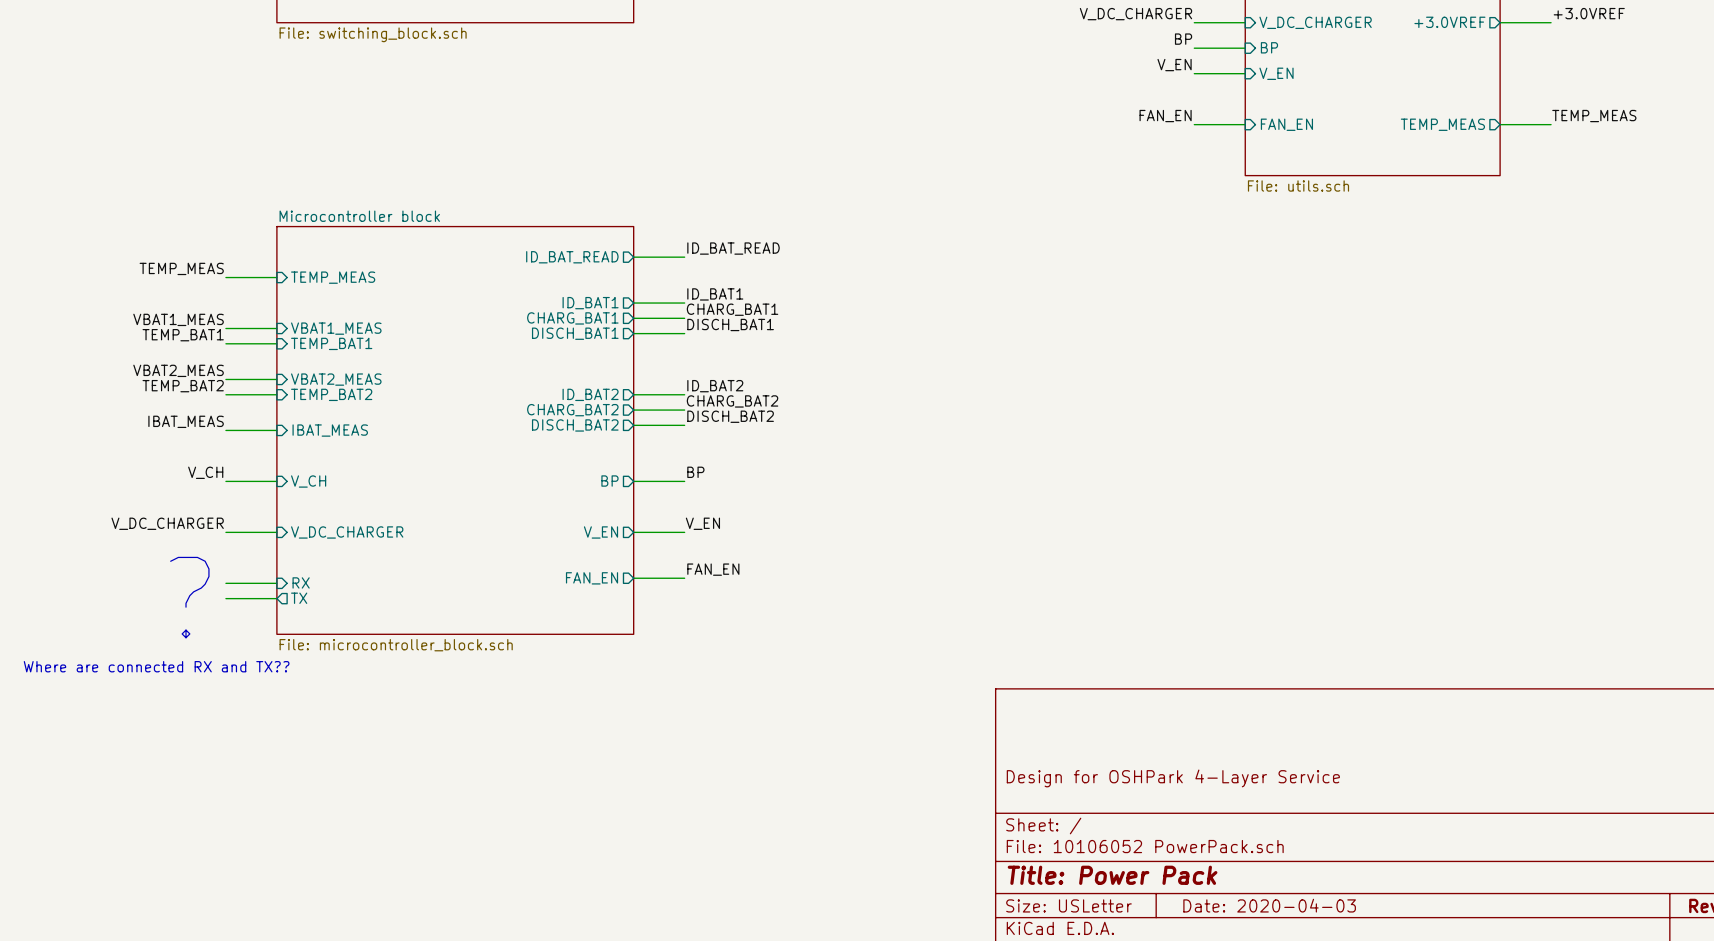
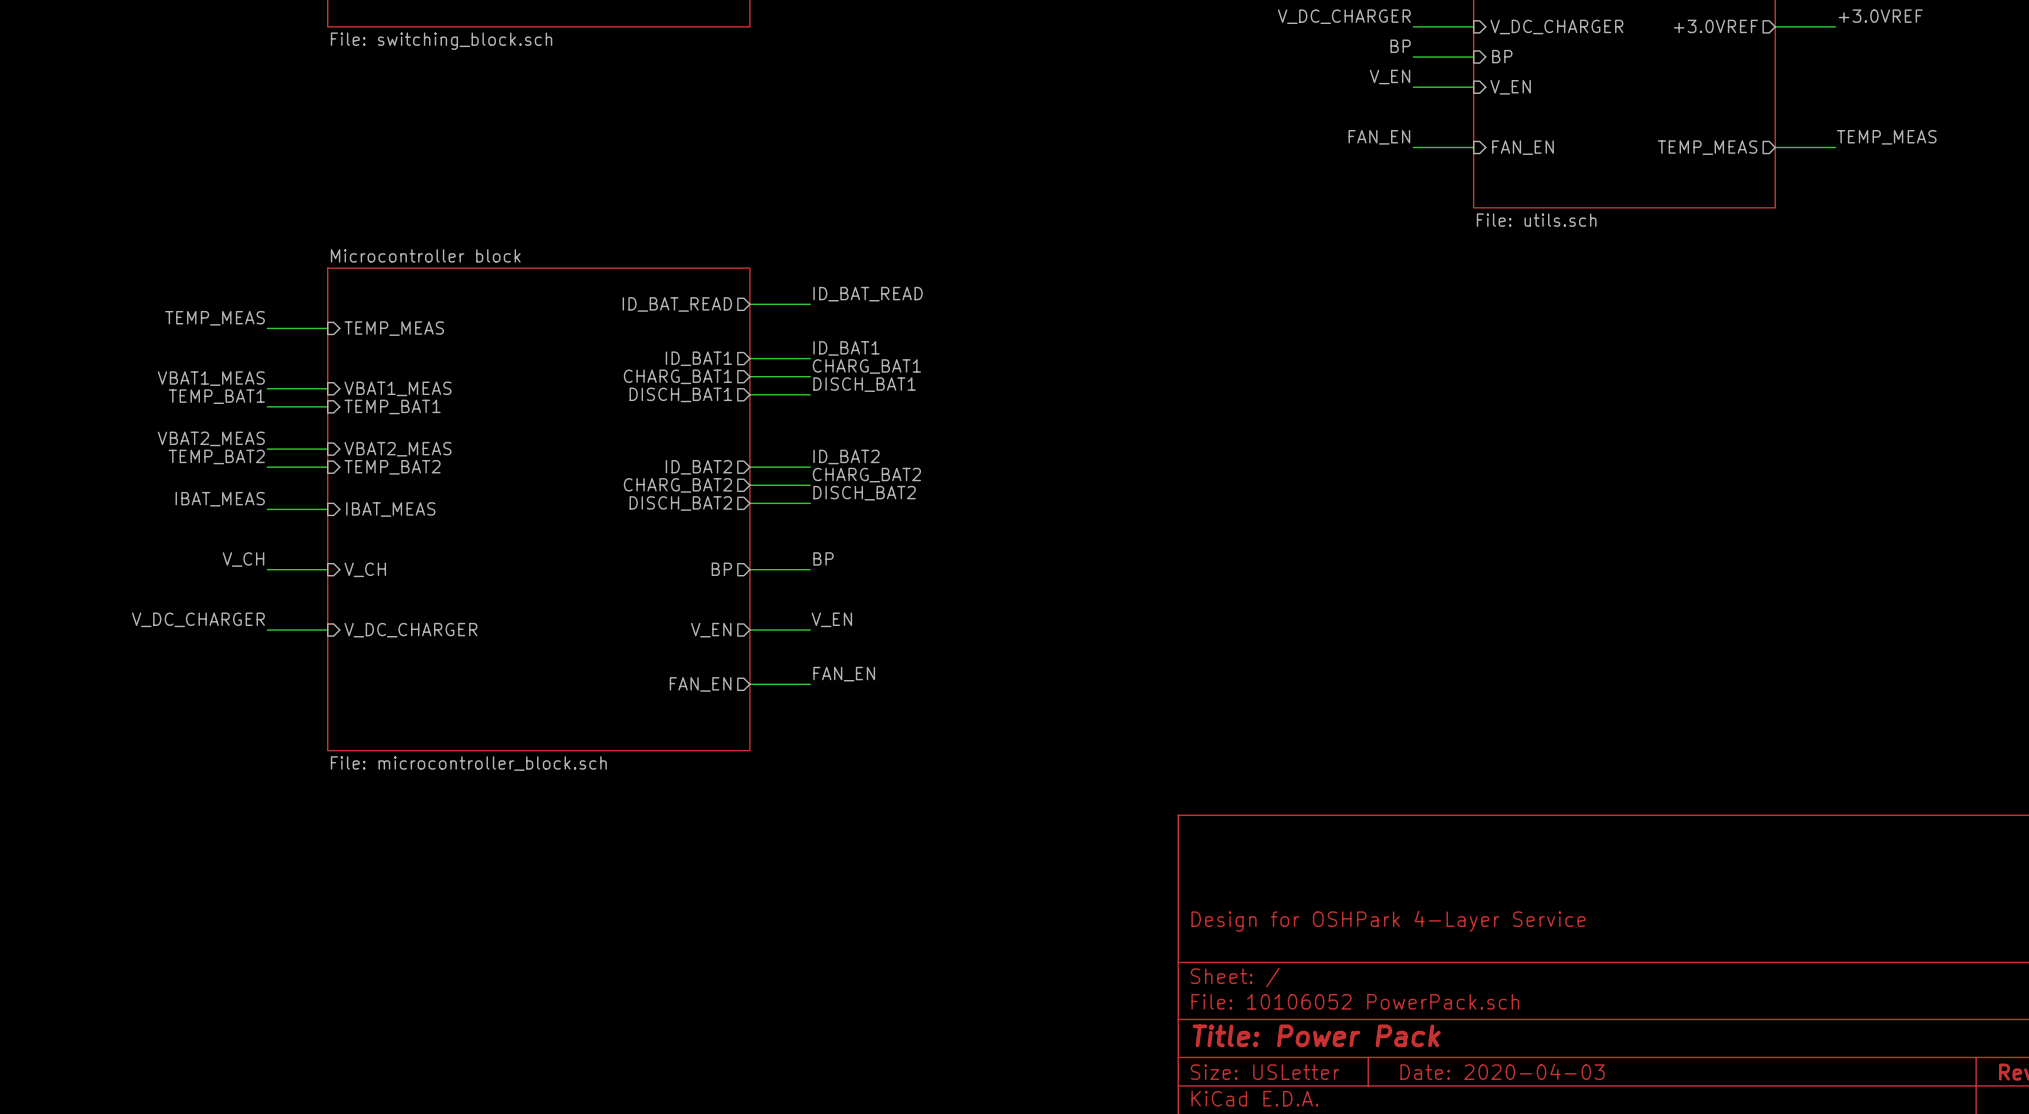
sheet pin: RX (301, 582) -> none
wire: (225, 583) (276, 583) -> none
text: ? (189, 597) -> none
wire: (225, 598) (276, 598) -> none
sheet pin: TX (299, 598) -> none
text: Where are connected RX and TX?? (156, 666) -> none

